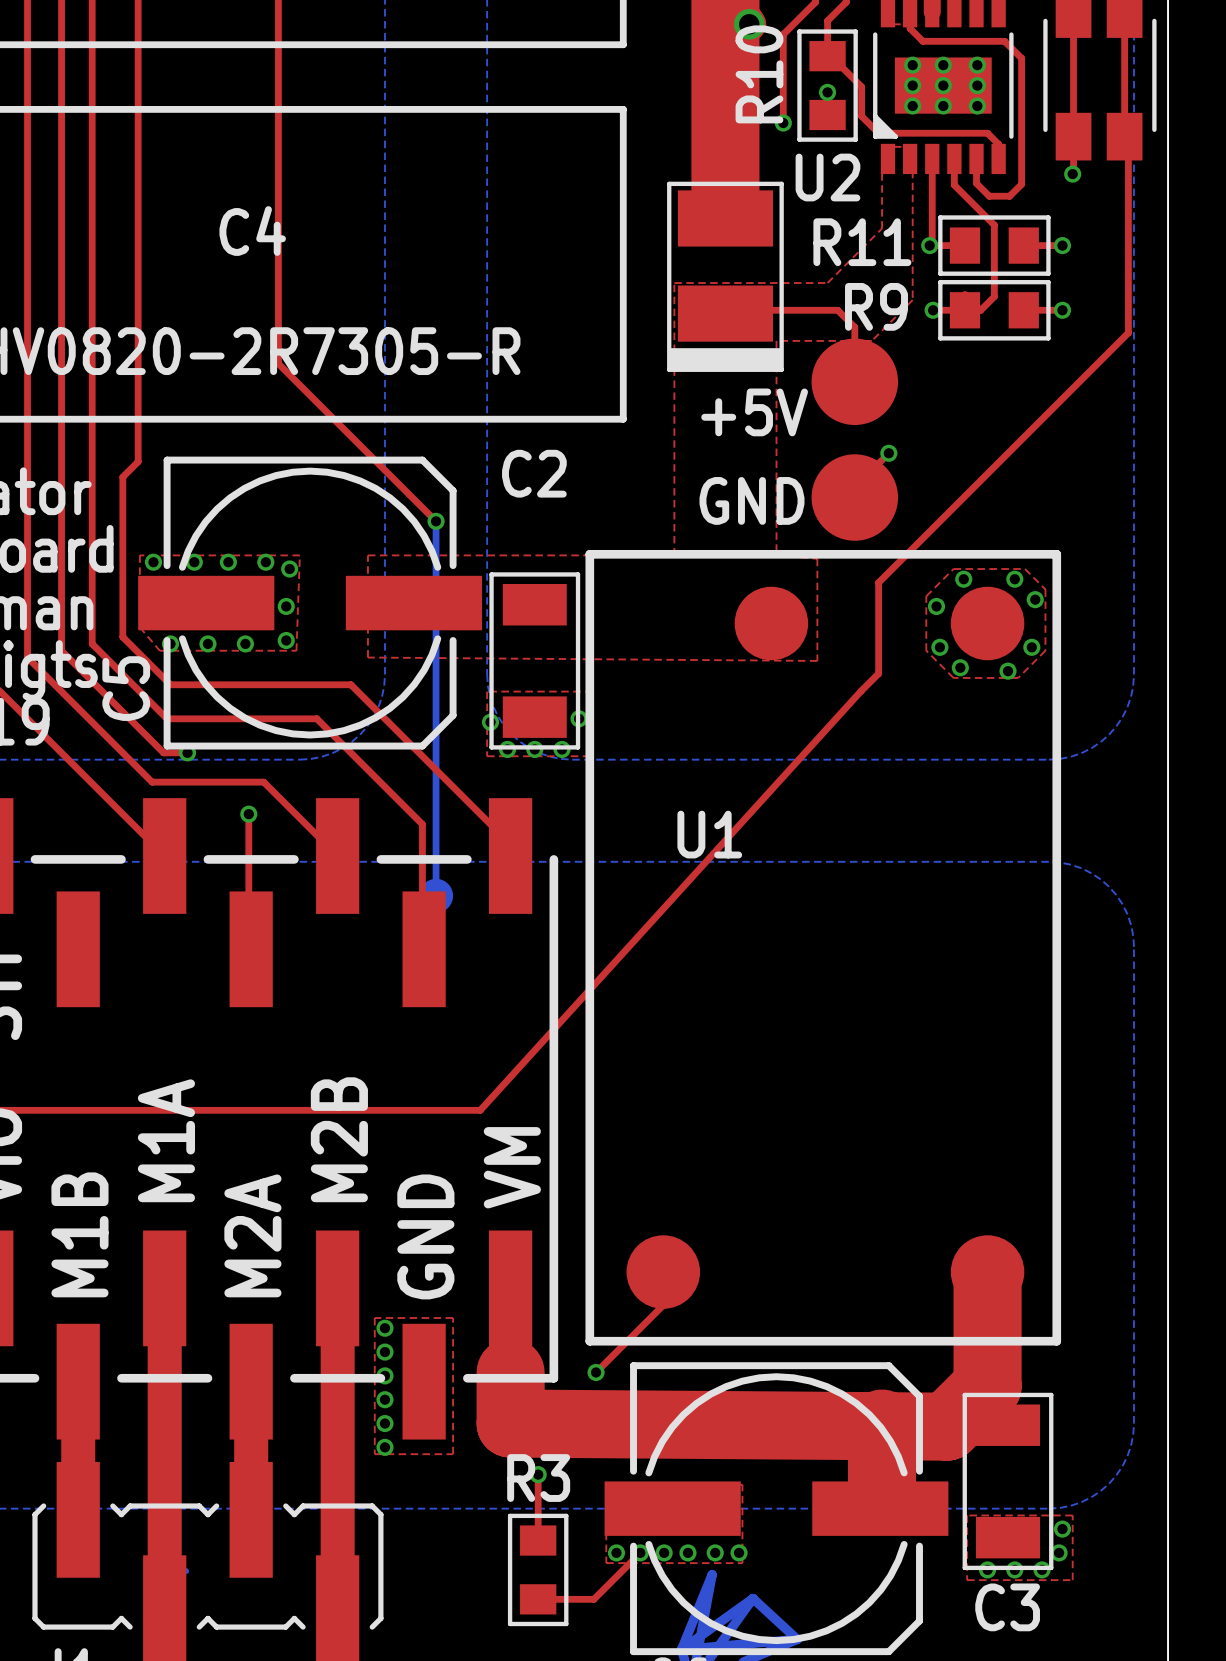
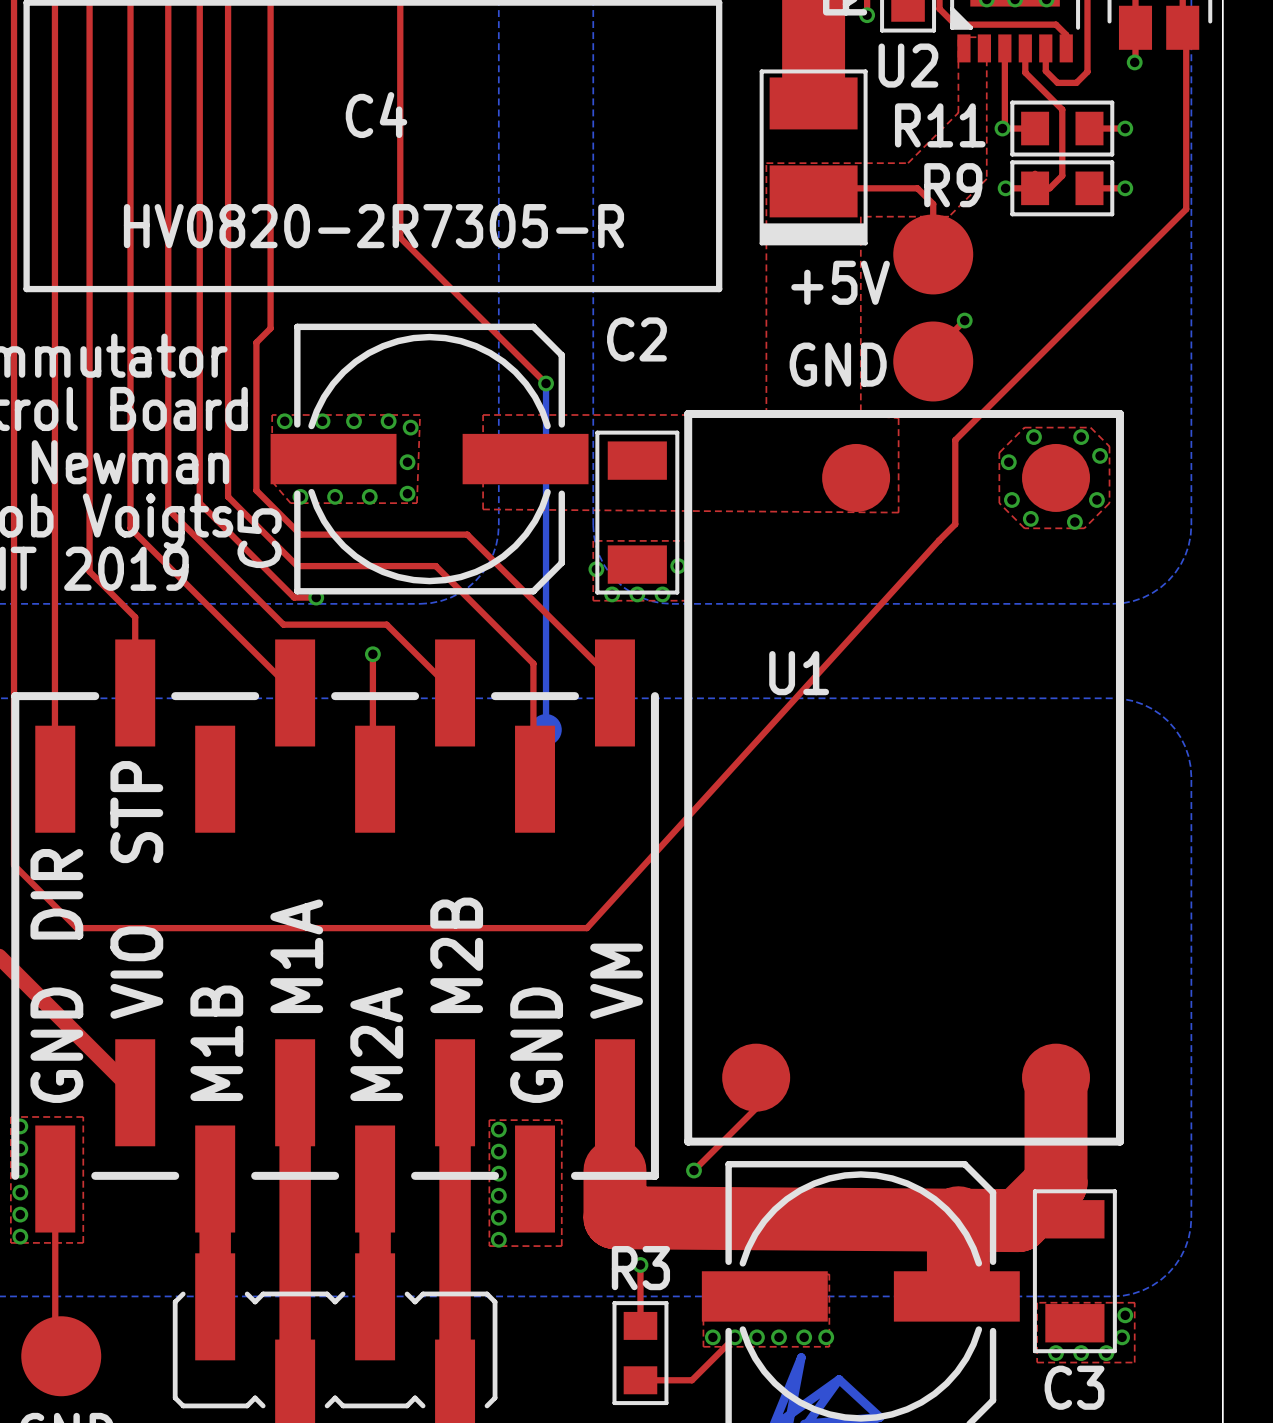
bottom track: (185, 1570) (186, 1571) -> none

